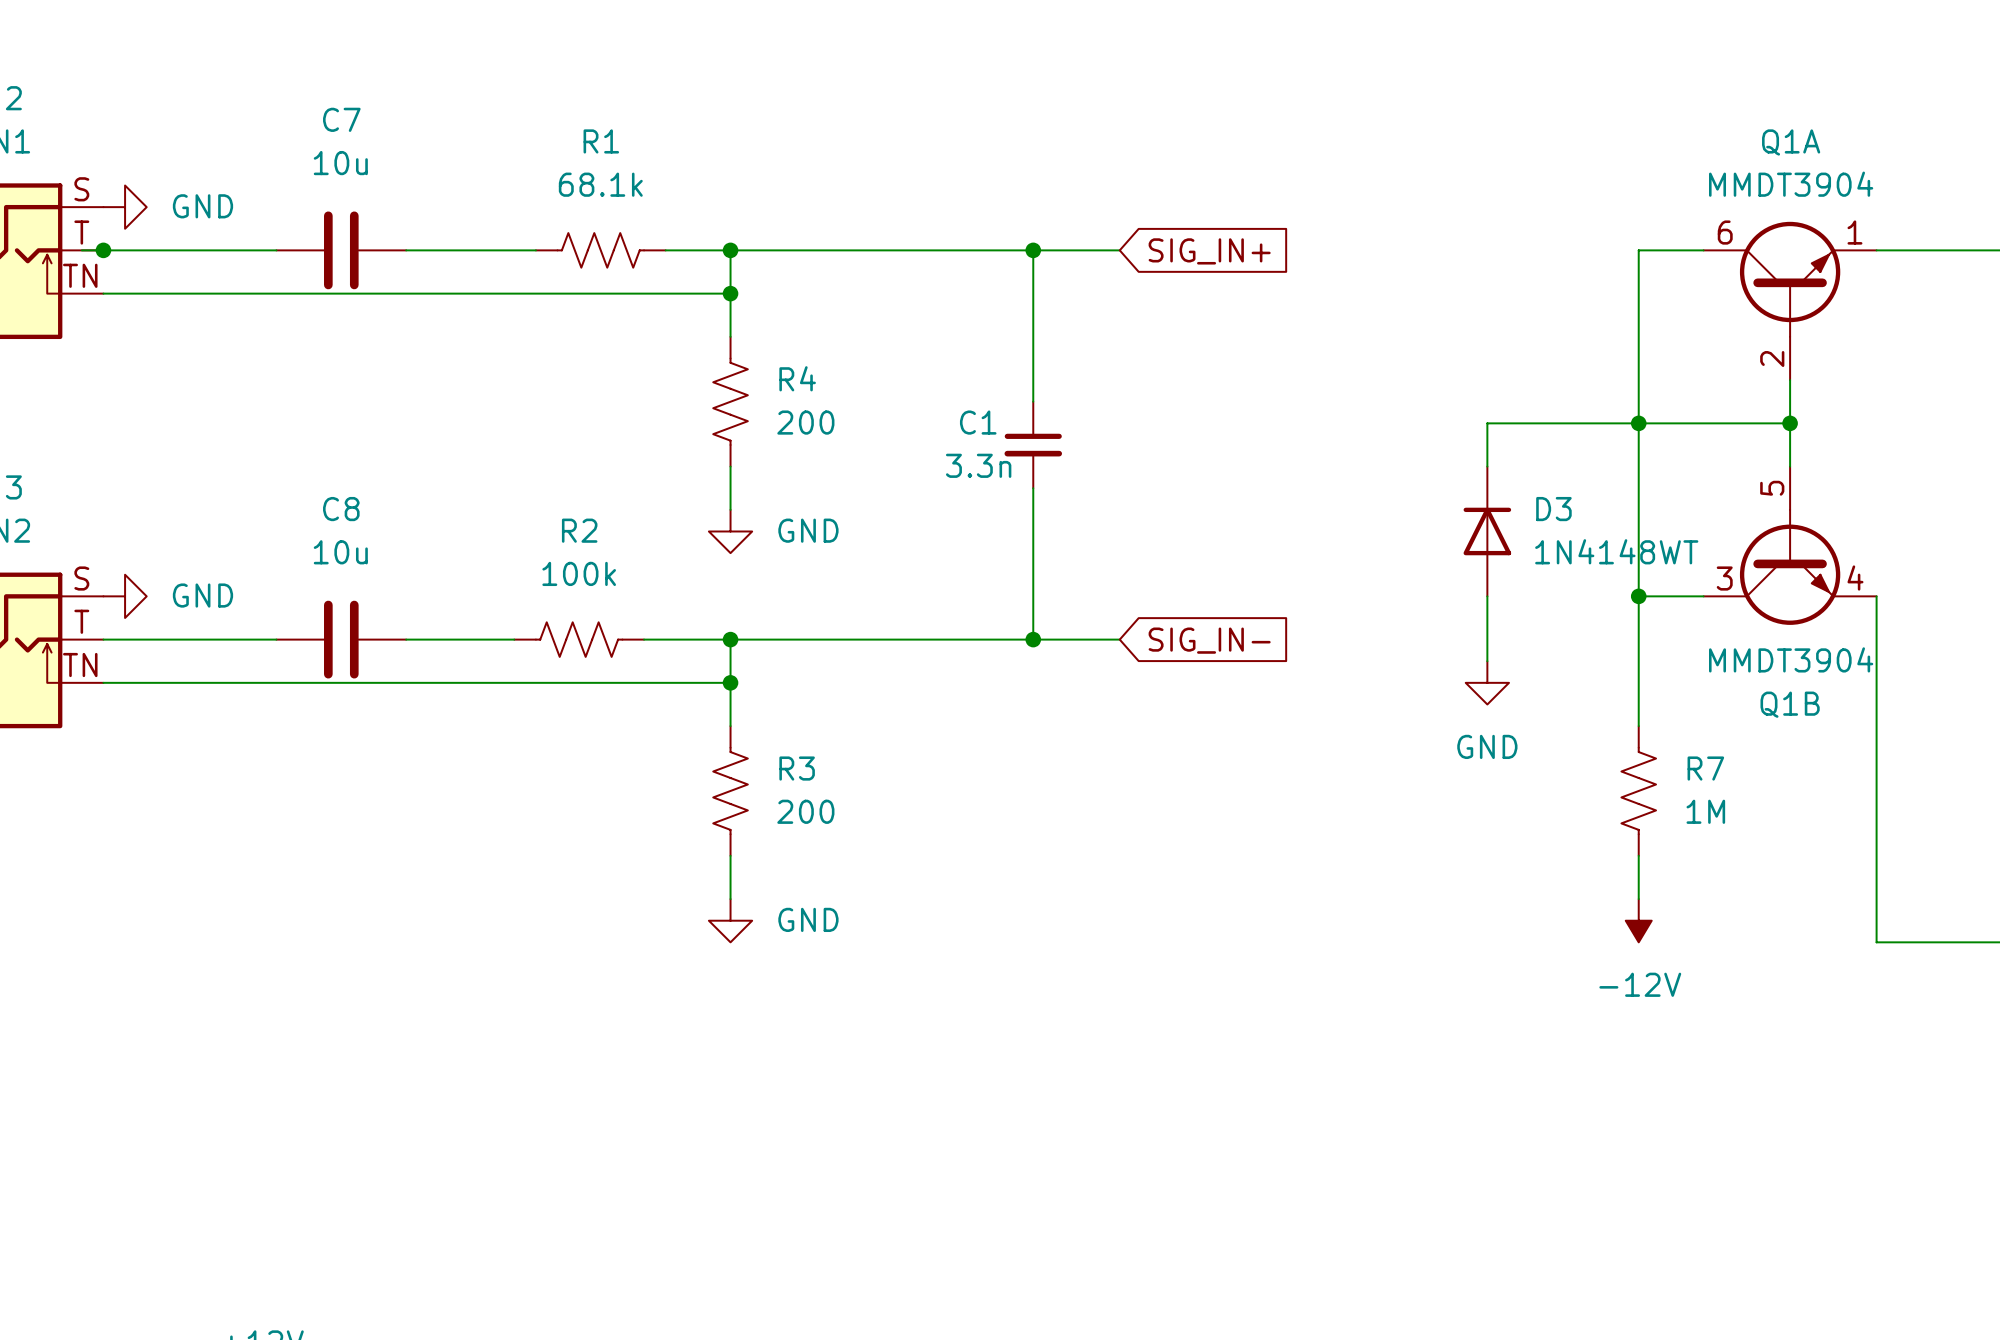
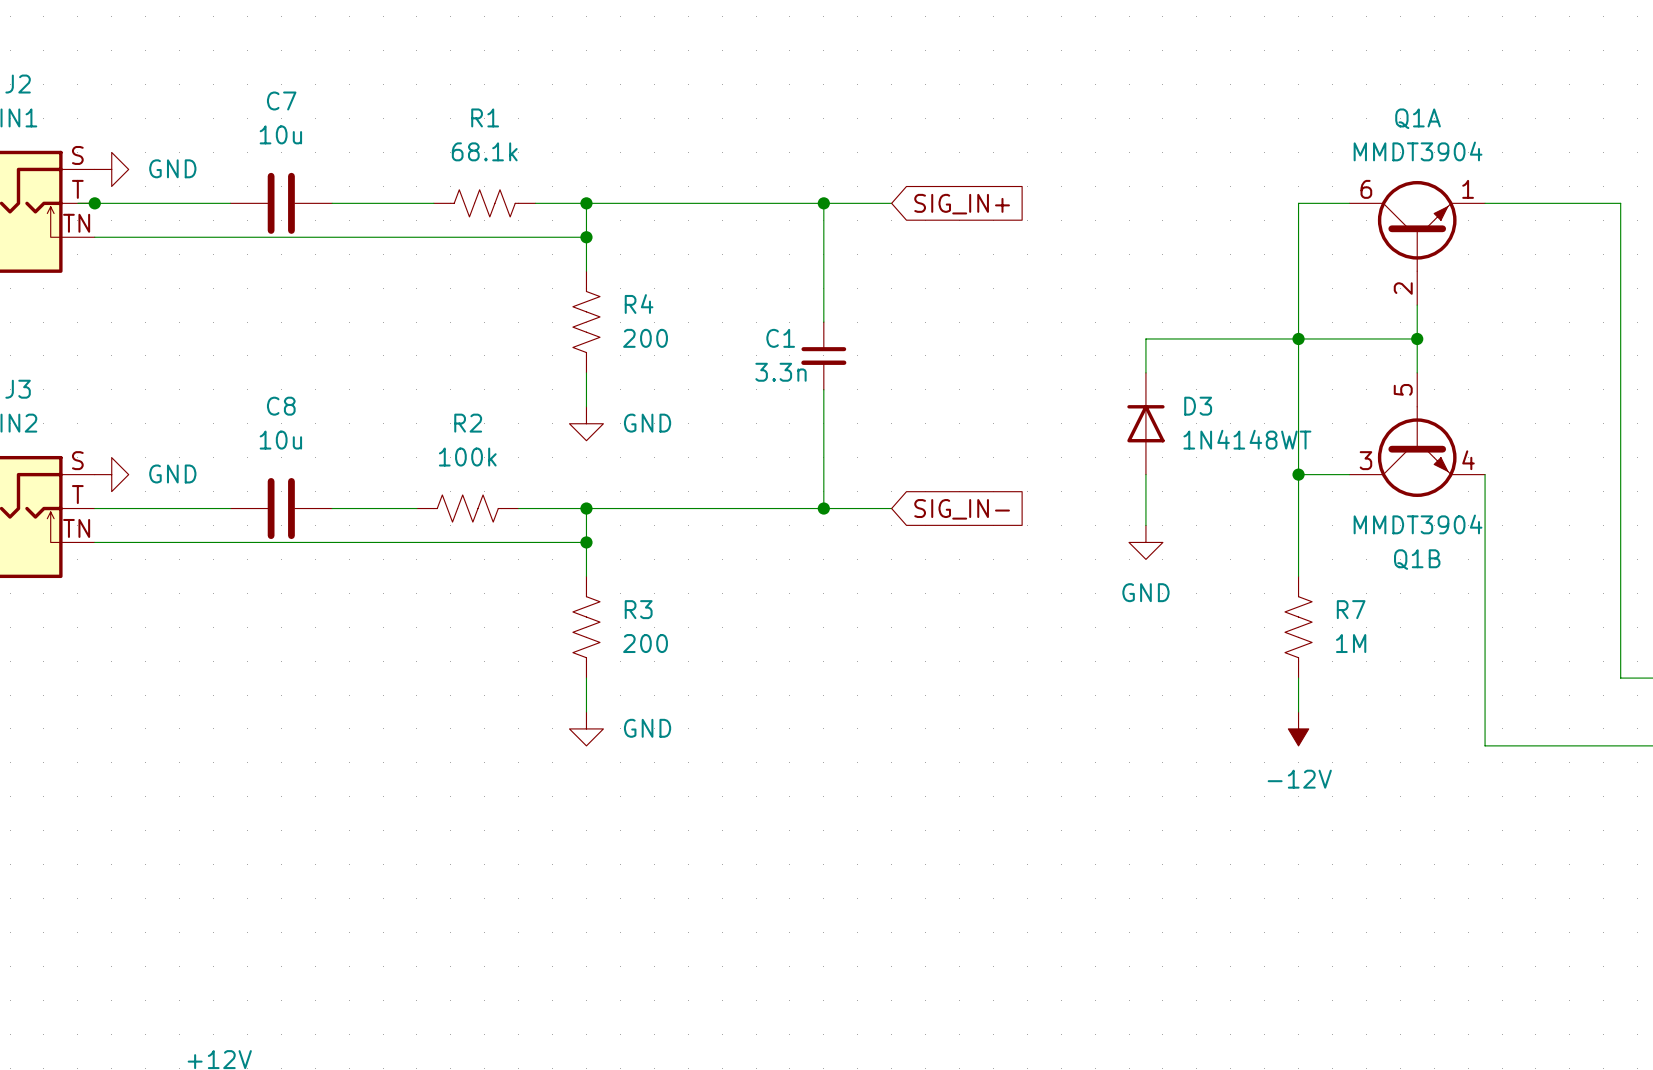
wire: (1487, 423) (1487, 466) -> (1179, 338) (1145, 338) (1145, 372)
D3 position: (1487, 531) -> (1145, 423)
wire: (1487, 596) (1487, 661) -> (1145, 474) (1145, 525)
power symbol position: GND (1487, 682) -> GND (1145, 542)

